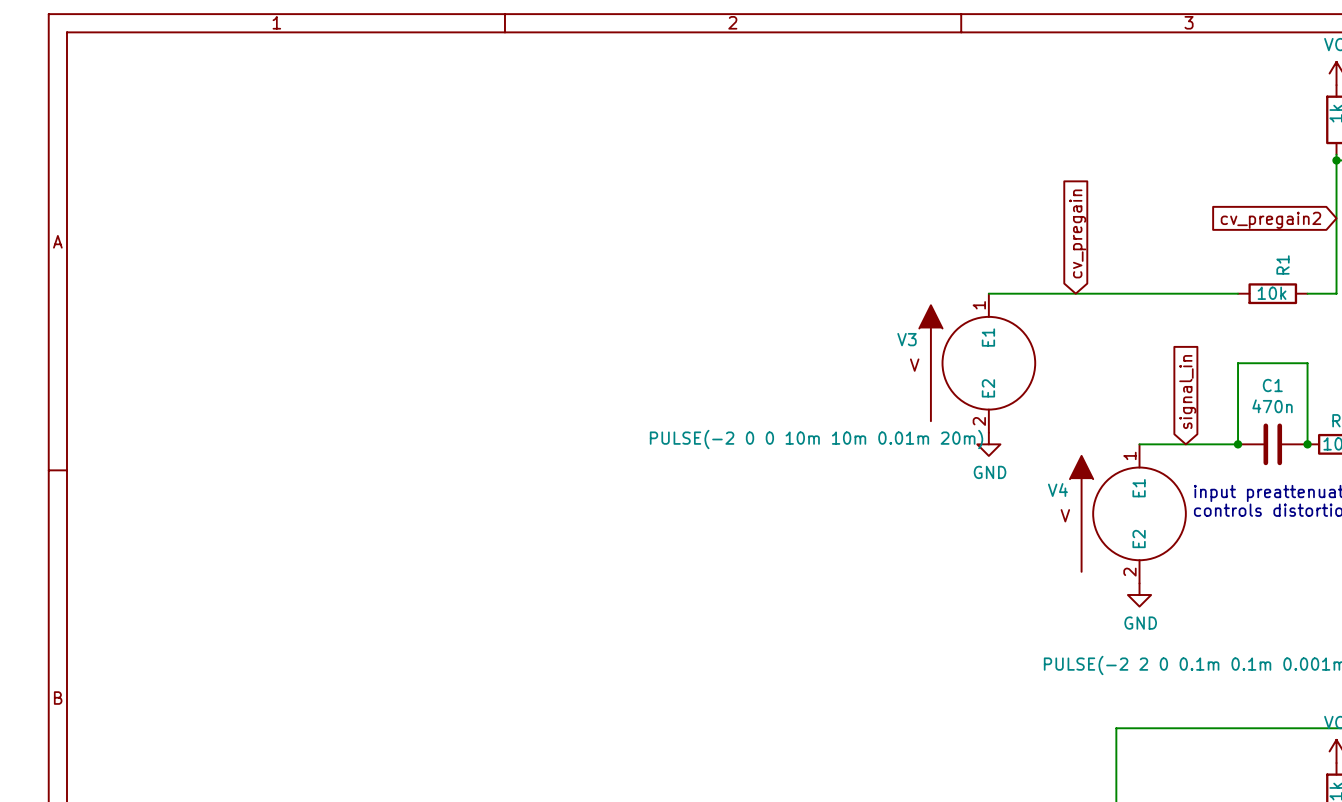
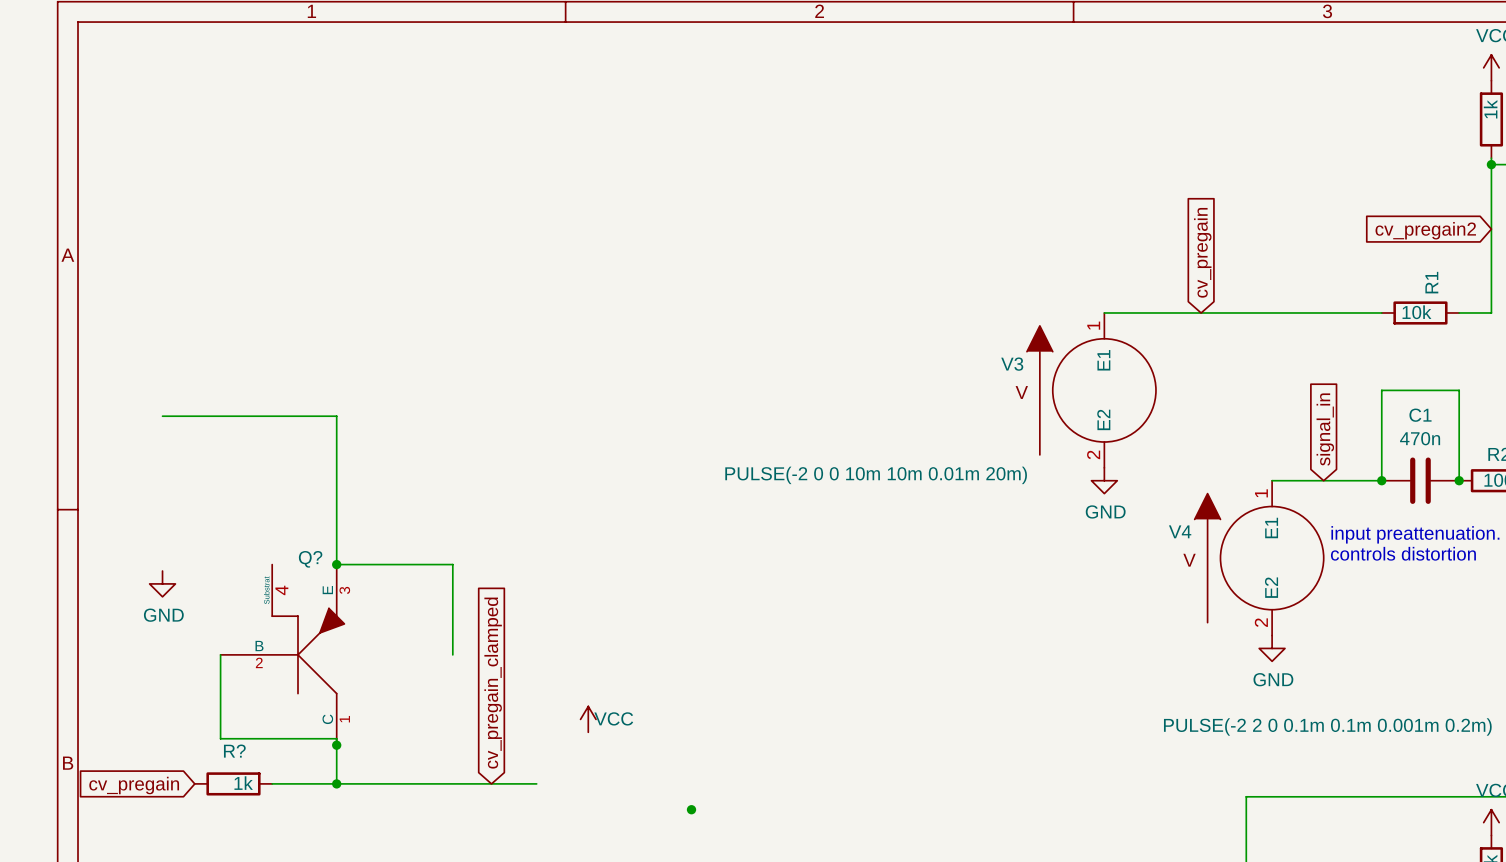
wire: none -> (162, 416) (336, 416) (336, 564) (452, 564) (452, 654)
junction: none -> (336, 564)
power symbol: none -> GND (162, 583)
wire: none -> (220, 654) (220, 738) (336, 738) (336, 783)
Q?: none -> (282, 654)
global label: none -> cv_pregain_clamped (493, 683)
power symbol: none -> VCC (588, 719)
junction: none -> (336, 745)
R?: none -> 1k (233, 783)
wire: none -> (272, 783) (536, 783)
junction: none -> (336, 783)
global label: none -> cv_pregain (134, 785)
junction: none -> (691, 809)

